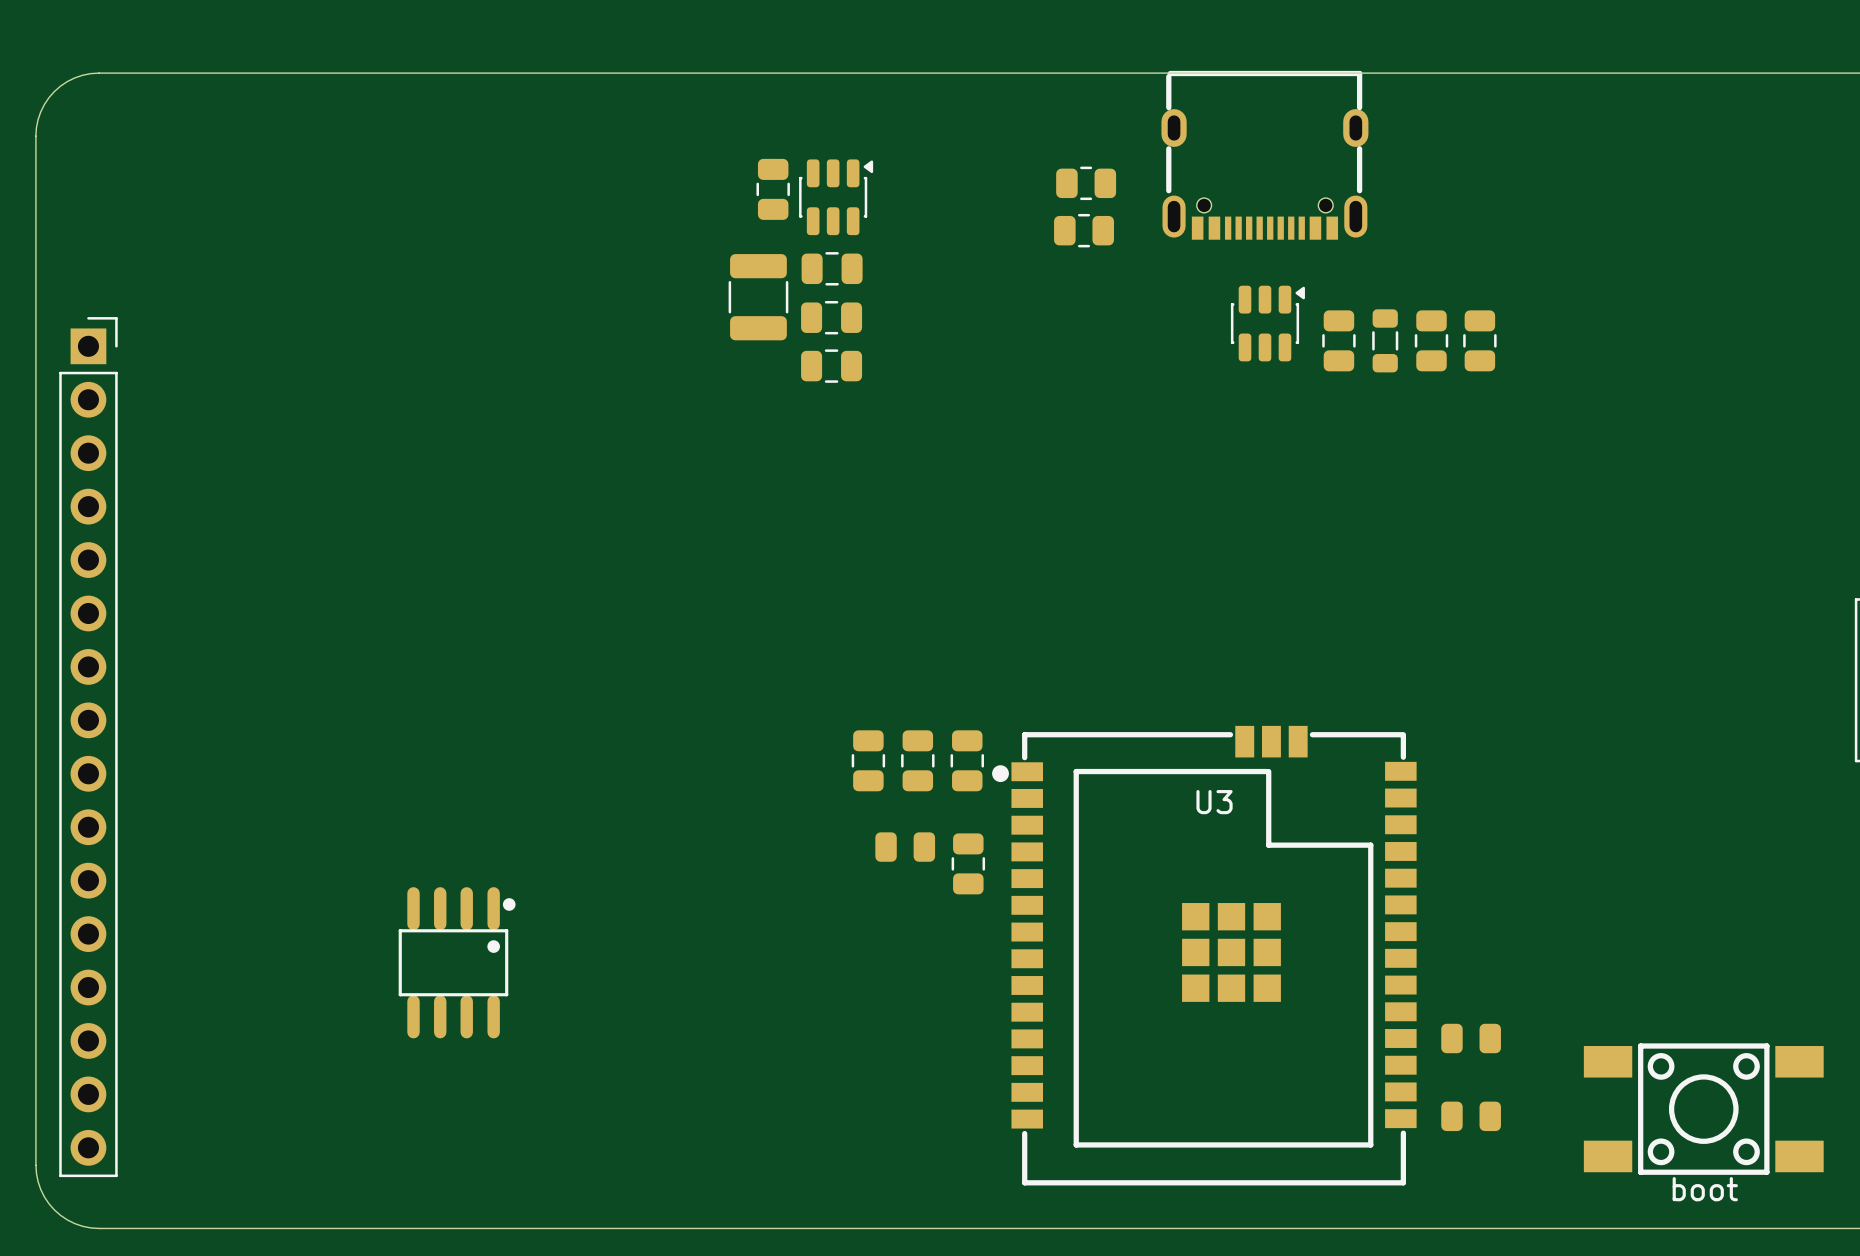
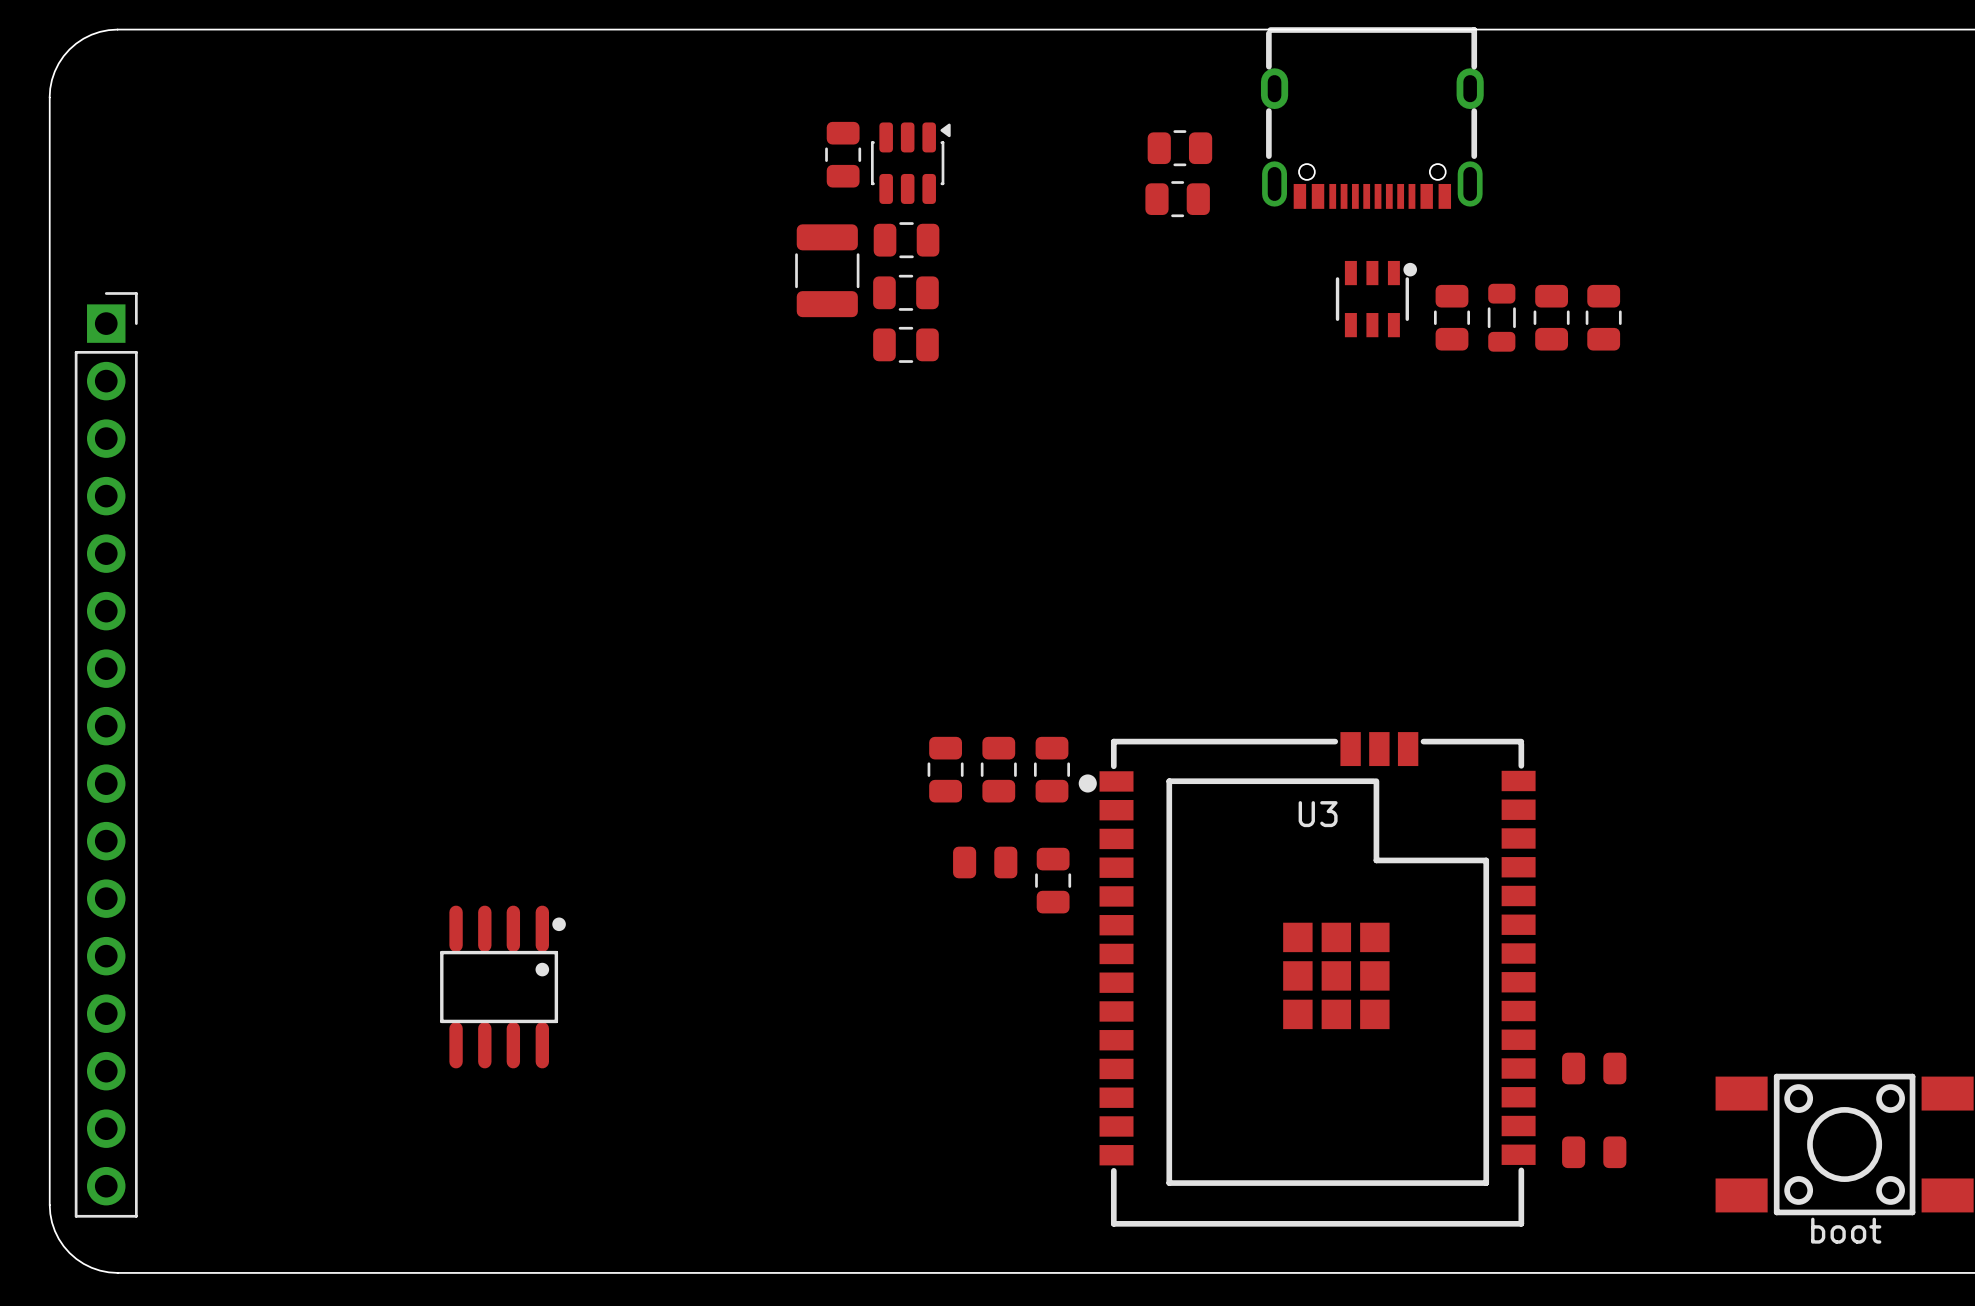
part footprint: [1230, 285, 1305, 362] -> [1335, 260, 1418, 338]

